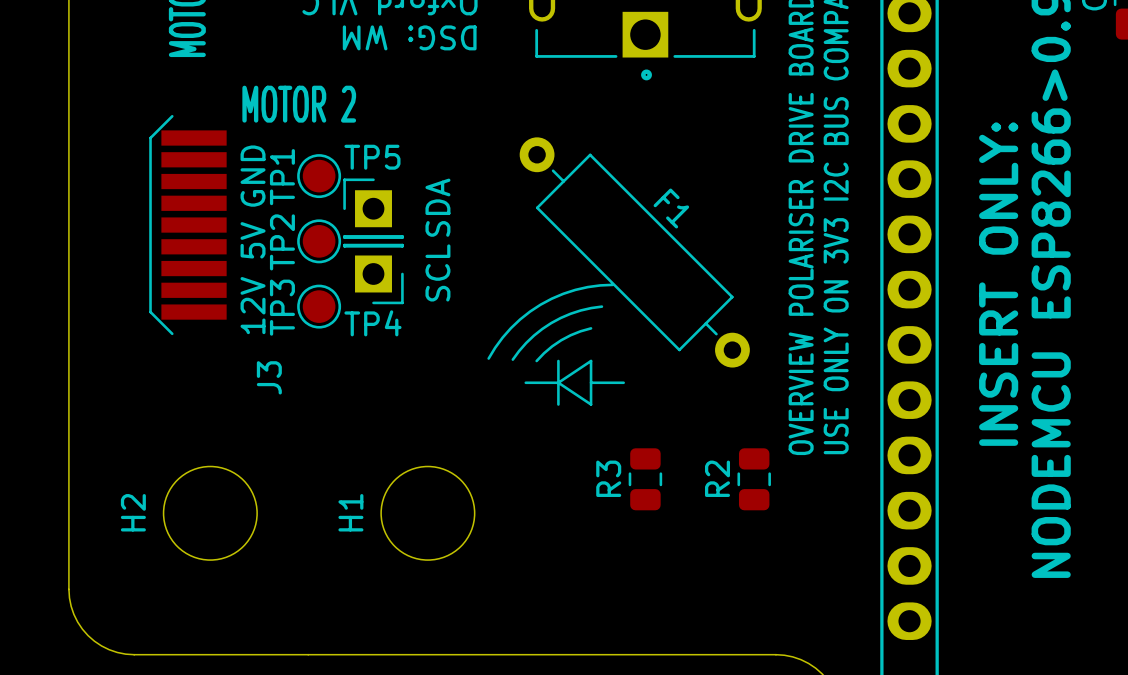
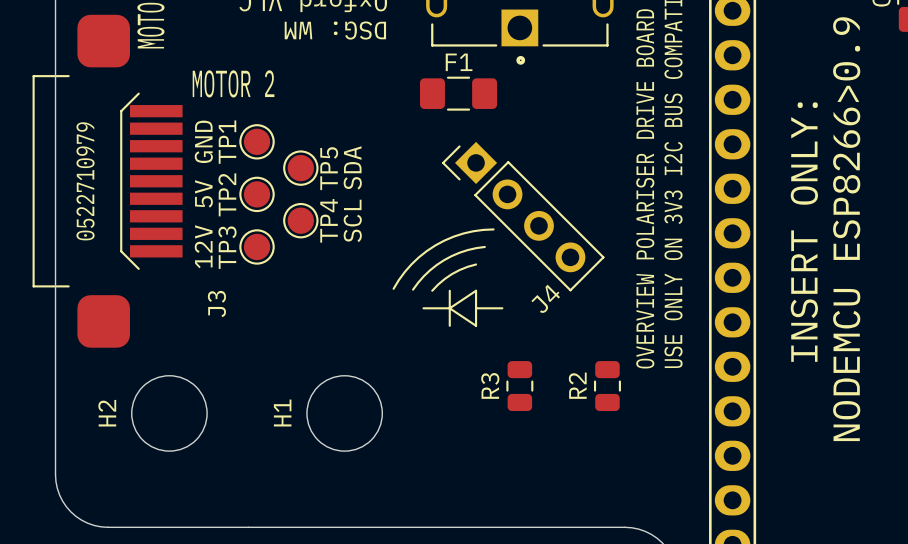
J3 footprint: [149, 114, 227, 336] -> [32, 14, 183, 348]
F1 footprint: [519, 137, 750, 368] -> [419, 76, 498, 111]
TP5 name position: TP5 (372, 157) -> TP5 (329, 168)
TP5 footprint: [343, 178, 404, 239] -> [283, 150, 319, 186]
TP4 footprint: [343, 243, 404, 305] -> [283, 202, 319, 239]
J4: none -> (523, 216)
TP4 name position: TP4 (372, 323) -> TP4 (329, 220)

